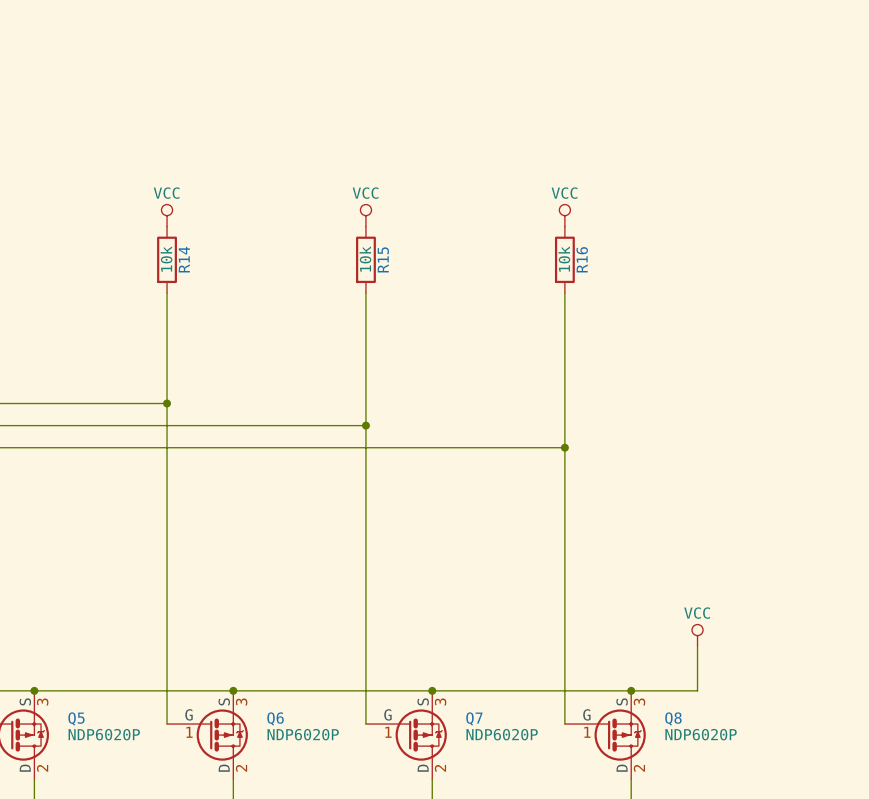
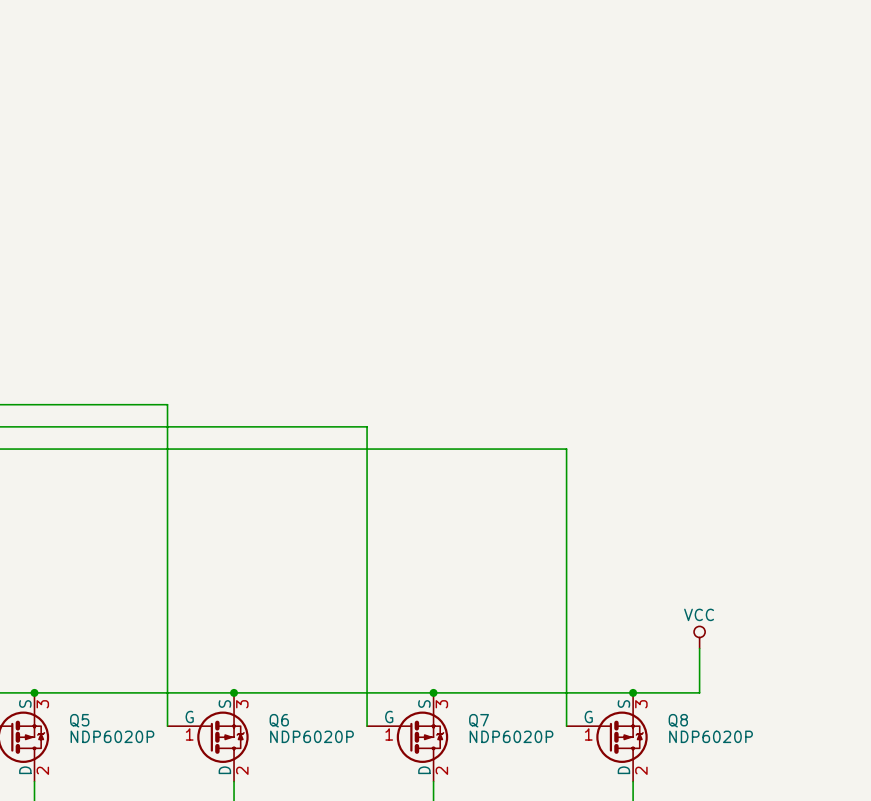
power symbol: VCC (167, 215) -> none
power symbol: VCC (365, 215) -> none
power symbol: VCC (564, 215) -> none
R14: 10k (167, 259) -> none
R15: 10k (365, 259) -> none
R16: 10k (564, 259) -> none
wire: (167, 292) (167, 403) -> none
wire: (365, 292) (365, 425) -> none
wire: (564, 292) (564, 447) -> none
junction: (167, 403) -> none
junction: (365, 425) -> none
junction: (564, 447) -> none

